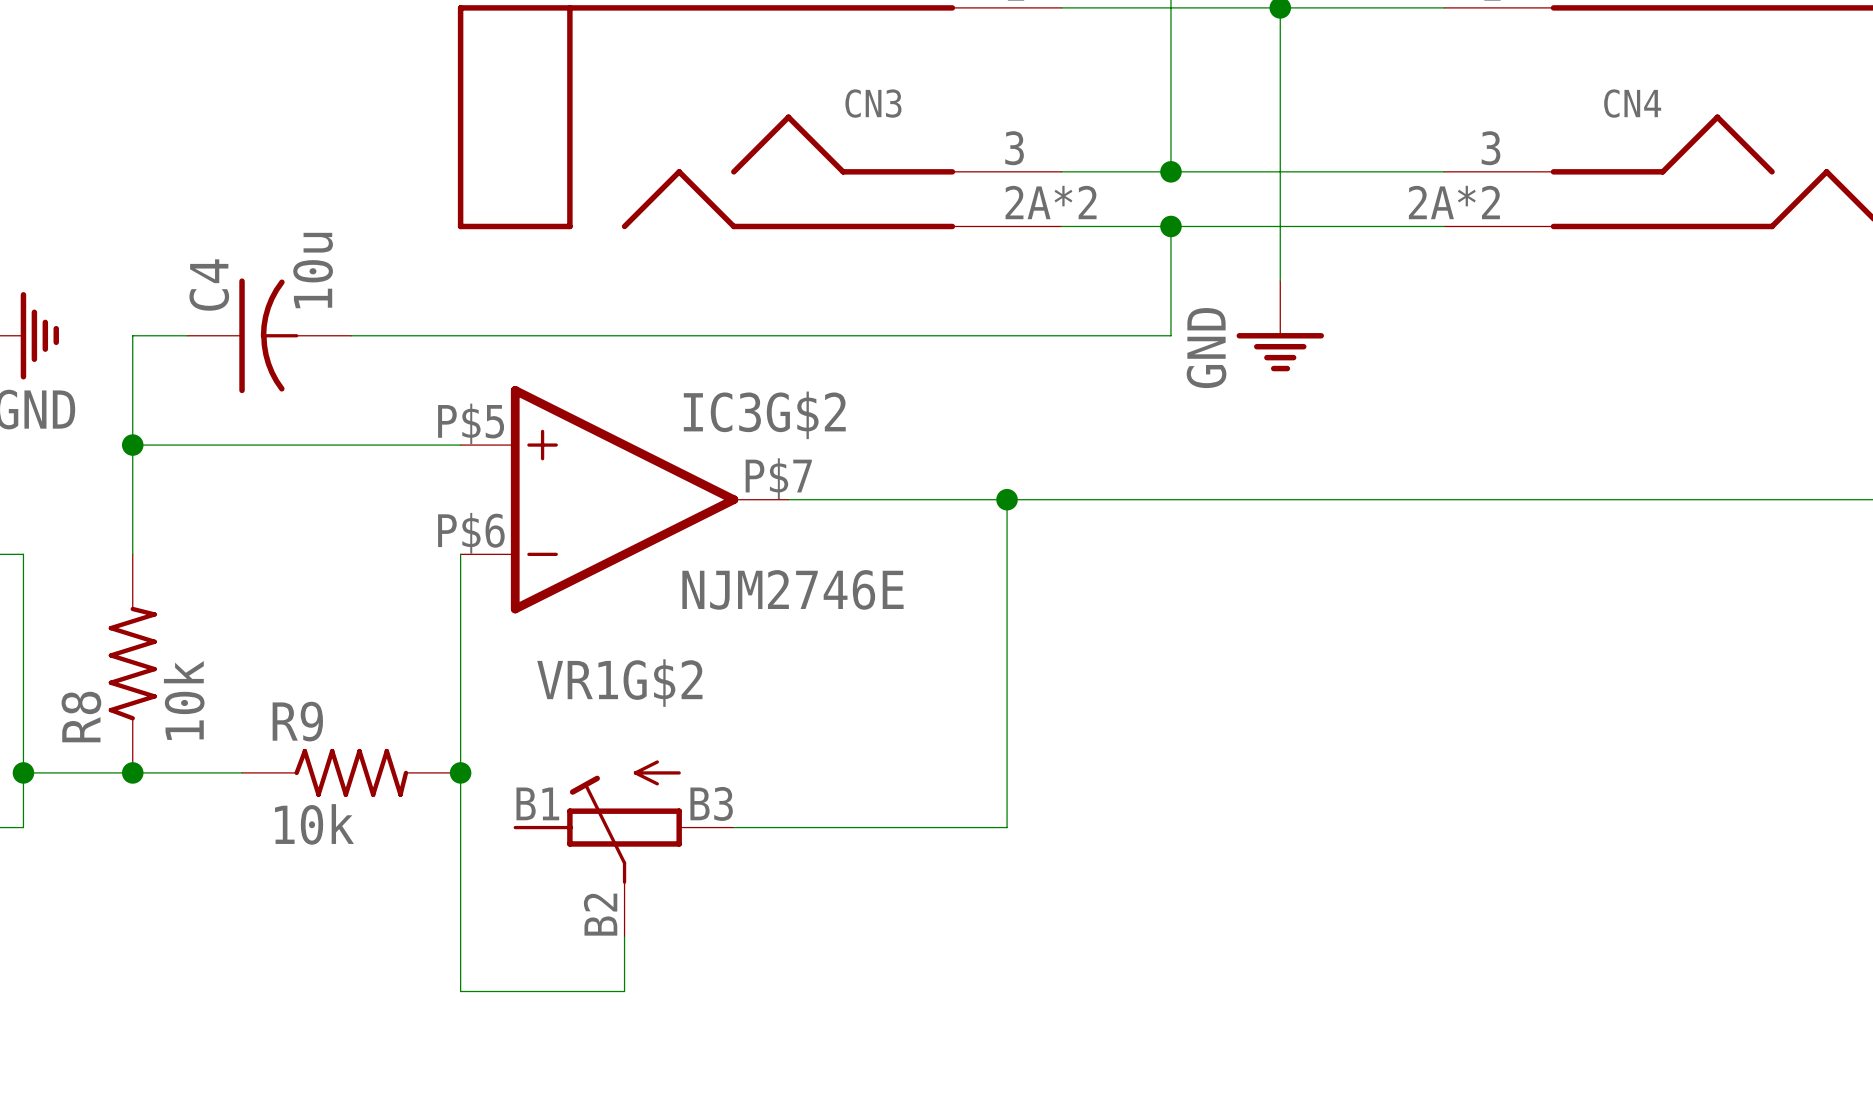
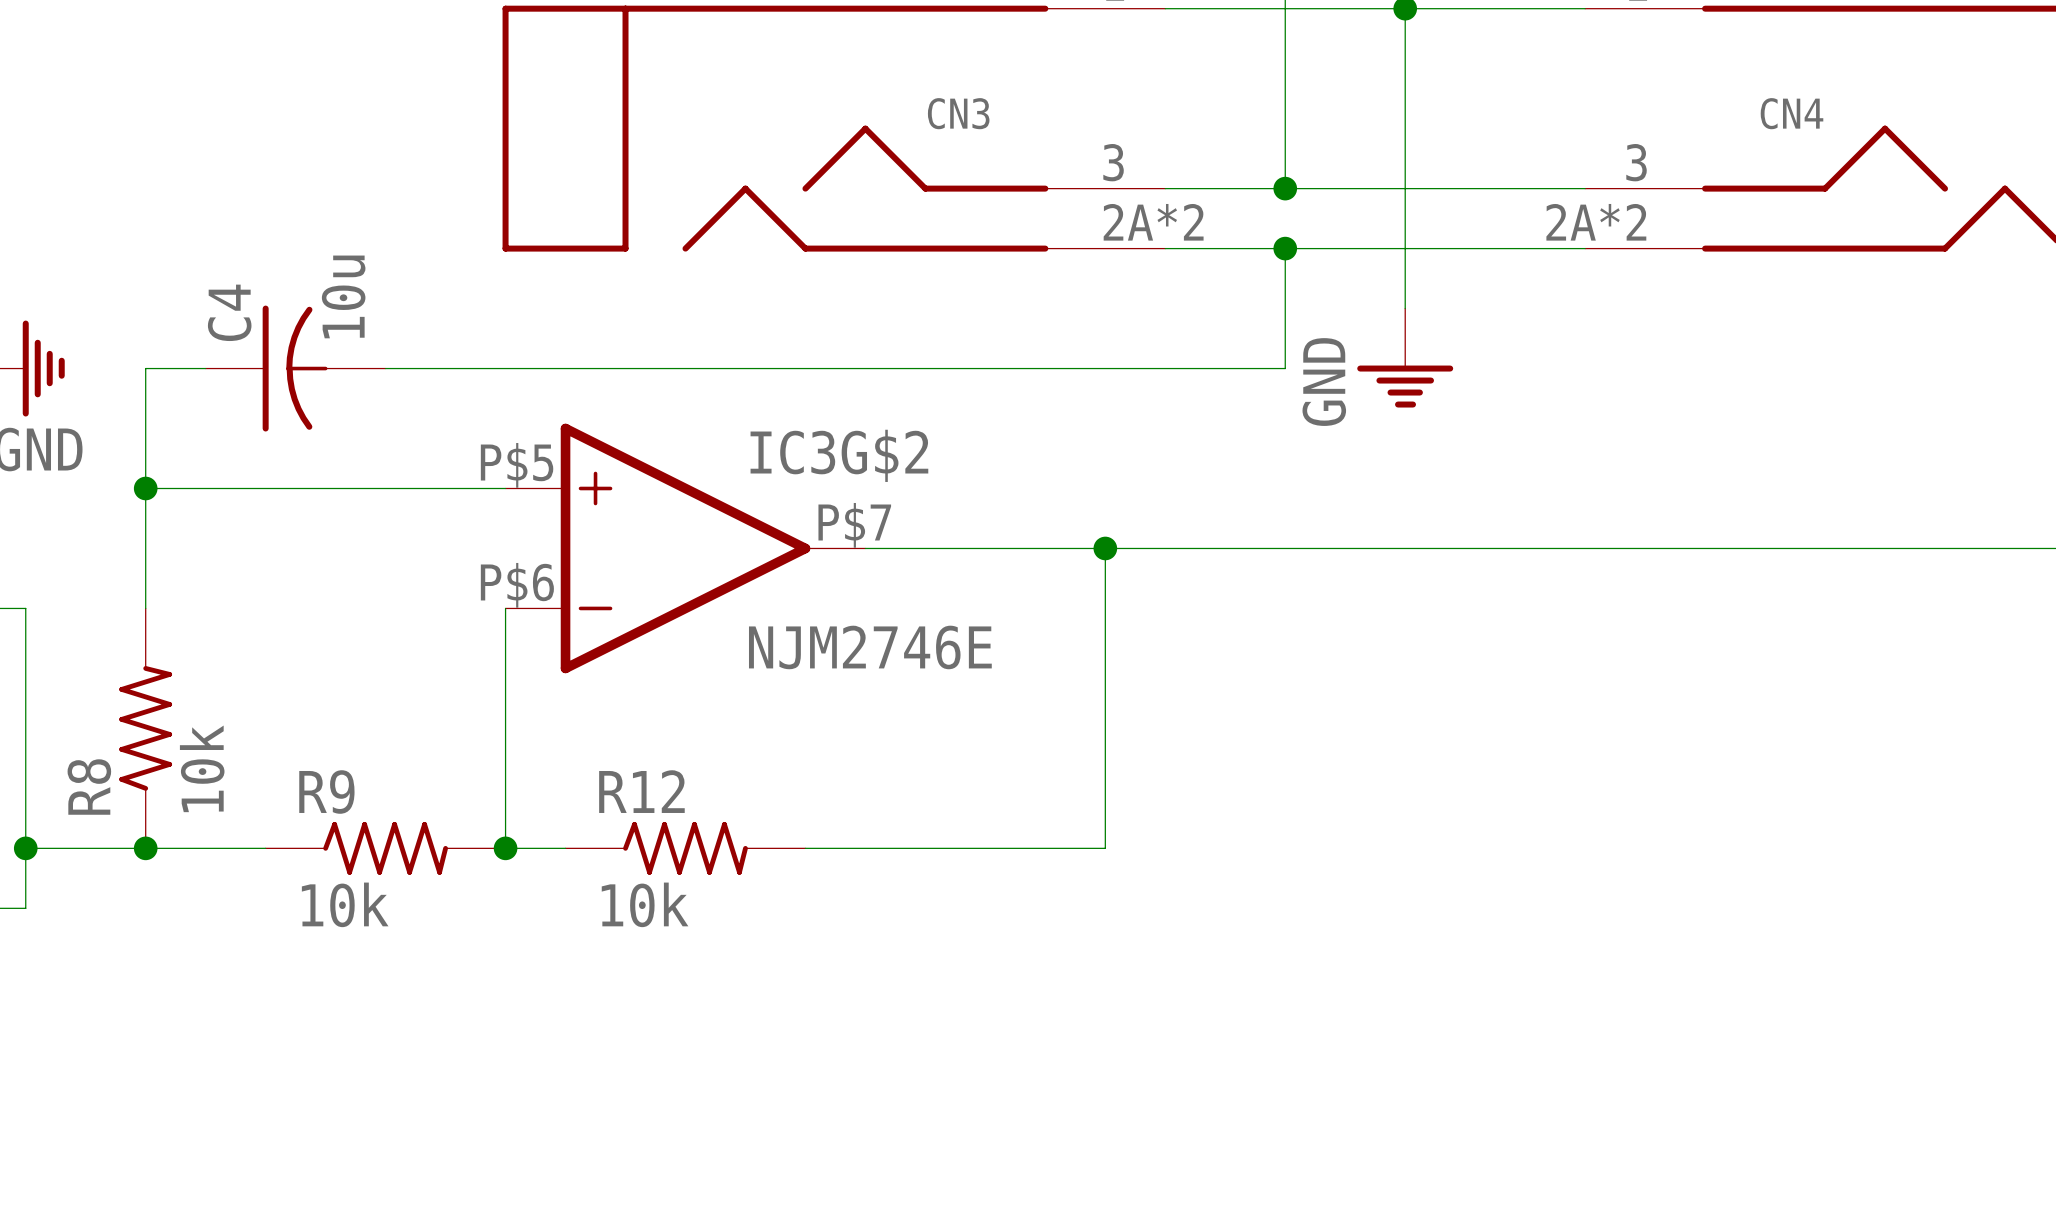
wire: (460, 772) (460, 991) (624, 991) (624, 936) -> (505, 848) (565, 848)
R12: none -> 10k (685, 848)
wire: (1007, 772) (1007, 827) (733, 827) -> (1105, 848) (805, 848)
VR1G$2: (623, 848) -> none

